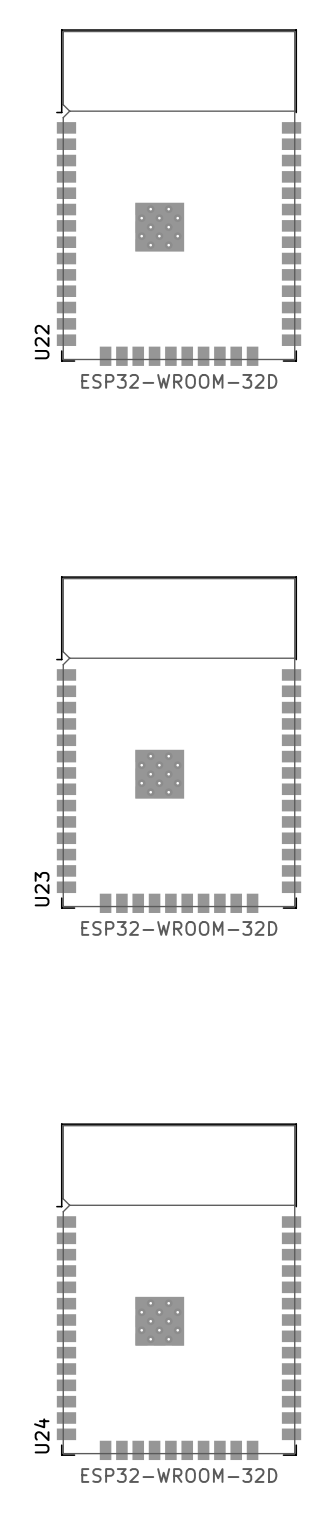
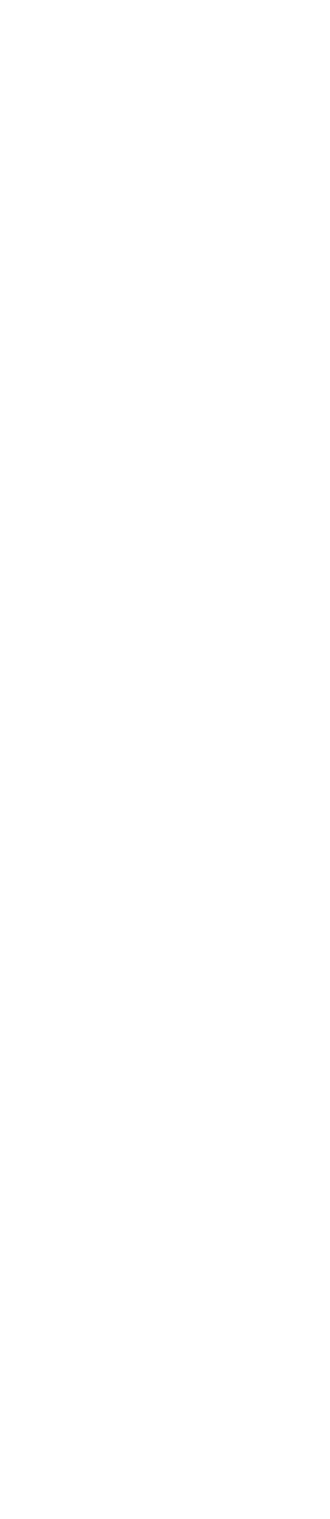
U22: ESP32-WROOM-32D (178, 197) -> none
U23: ESP32-WROOM-32D (178, 744) -> none
U24: ESP32-WROOM-32D (178, 1291) -> none

